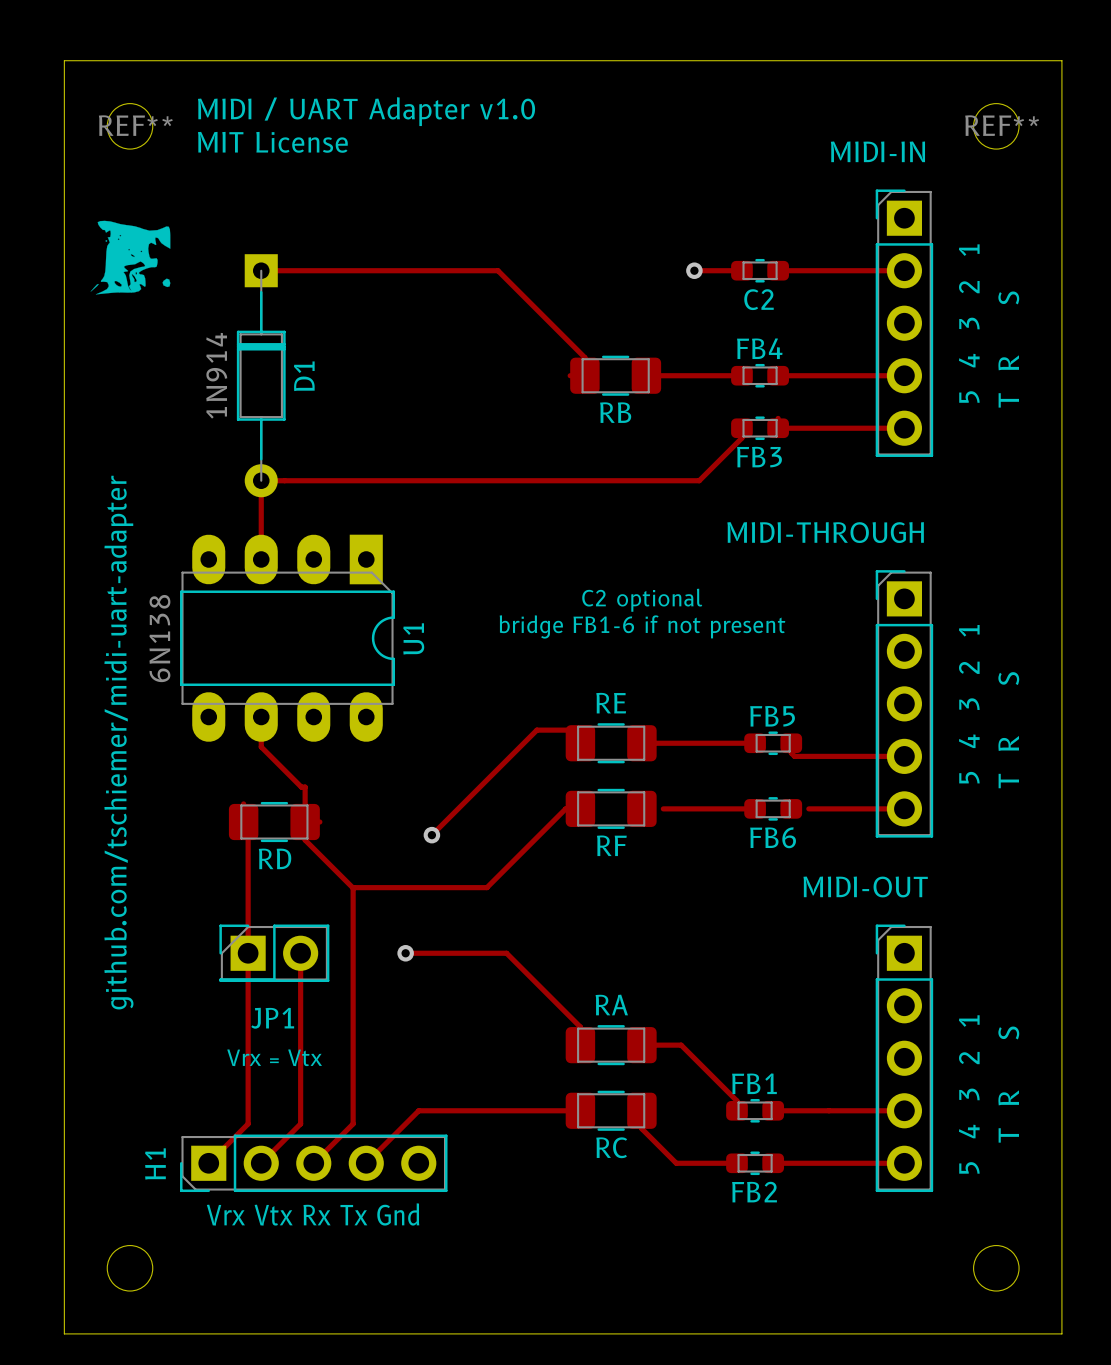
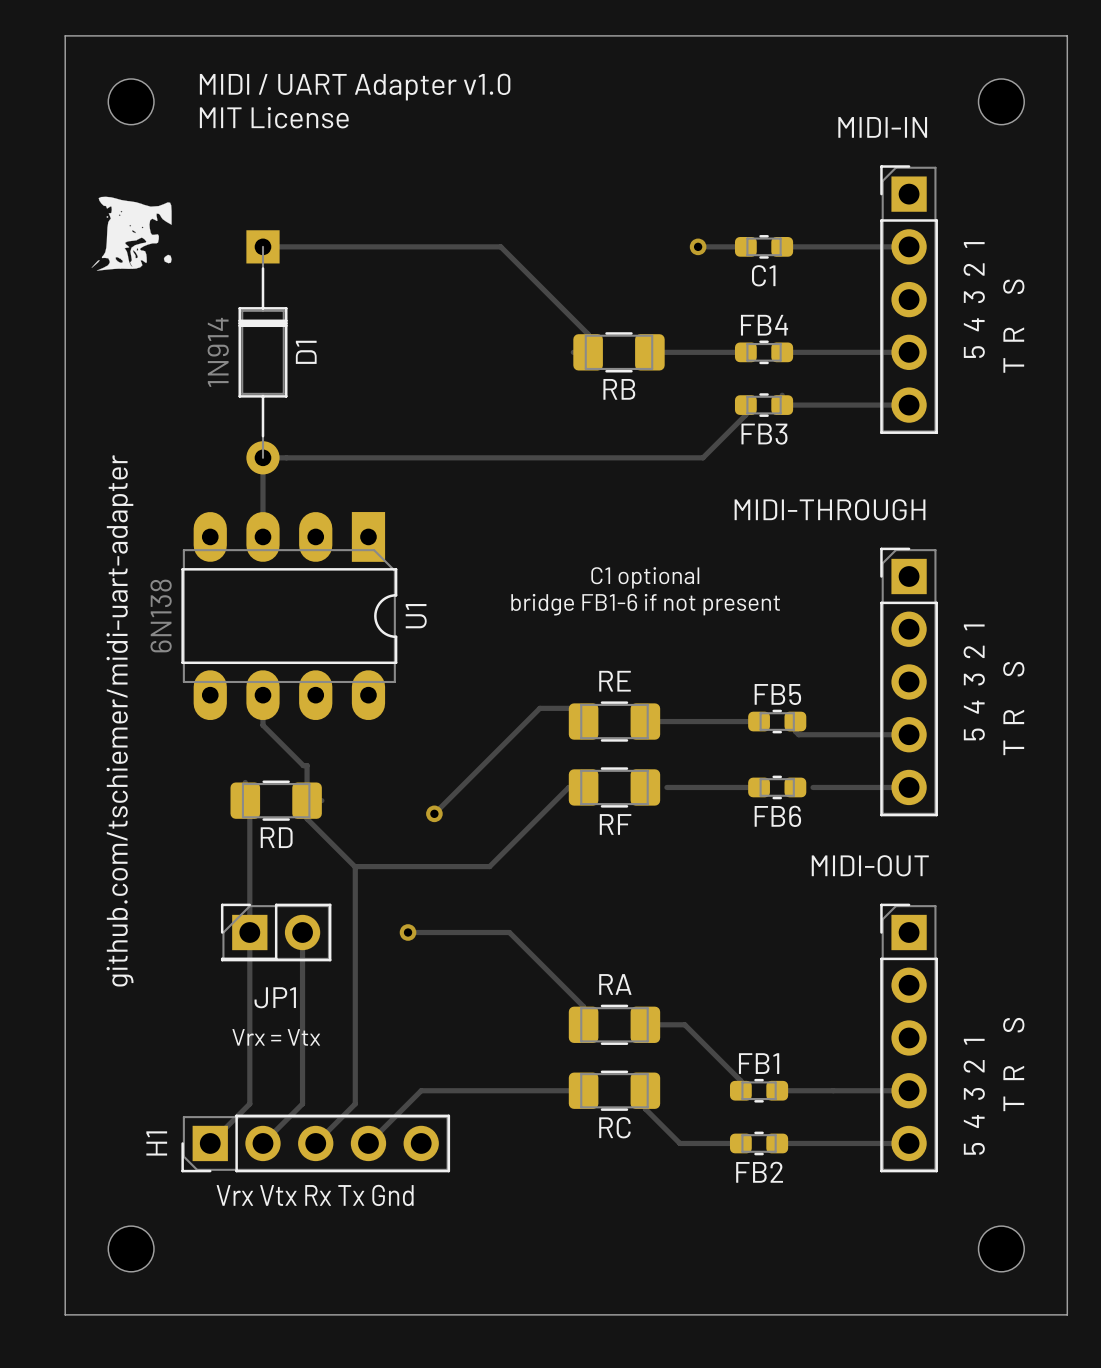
REF** name: REF** (135, 125) -> none
REF** name: REF** (1002, 125) -> none
C2 name: C2 (758, 299) -> C1 (763, 275)
text: C2 optional (642, 600) -> C1 optional (645, 577)

